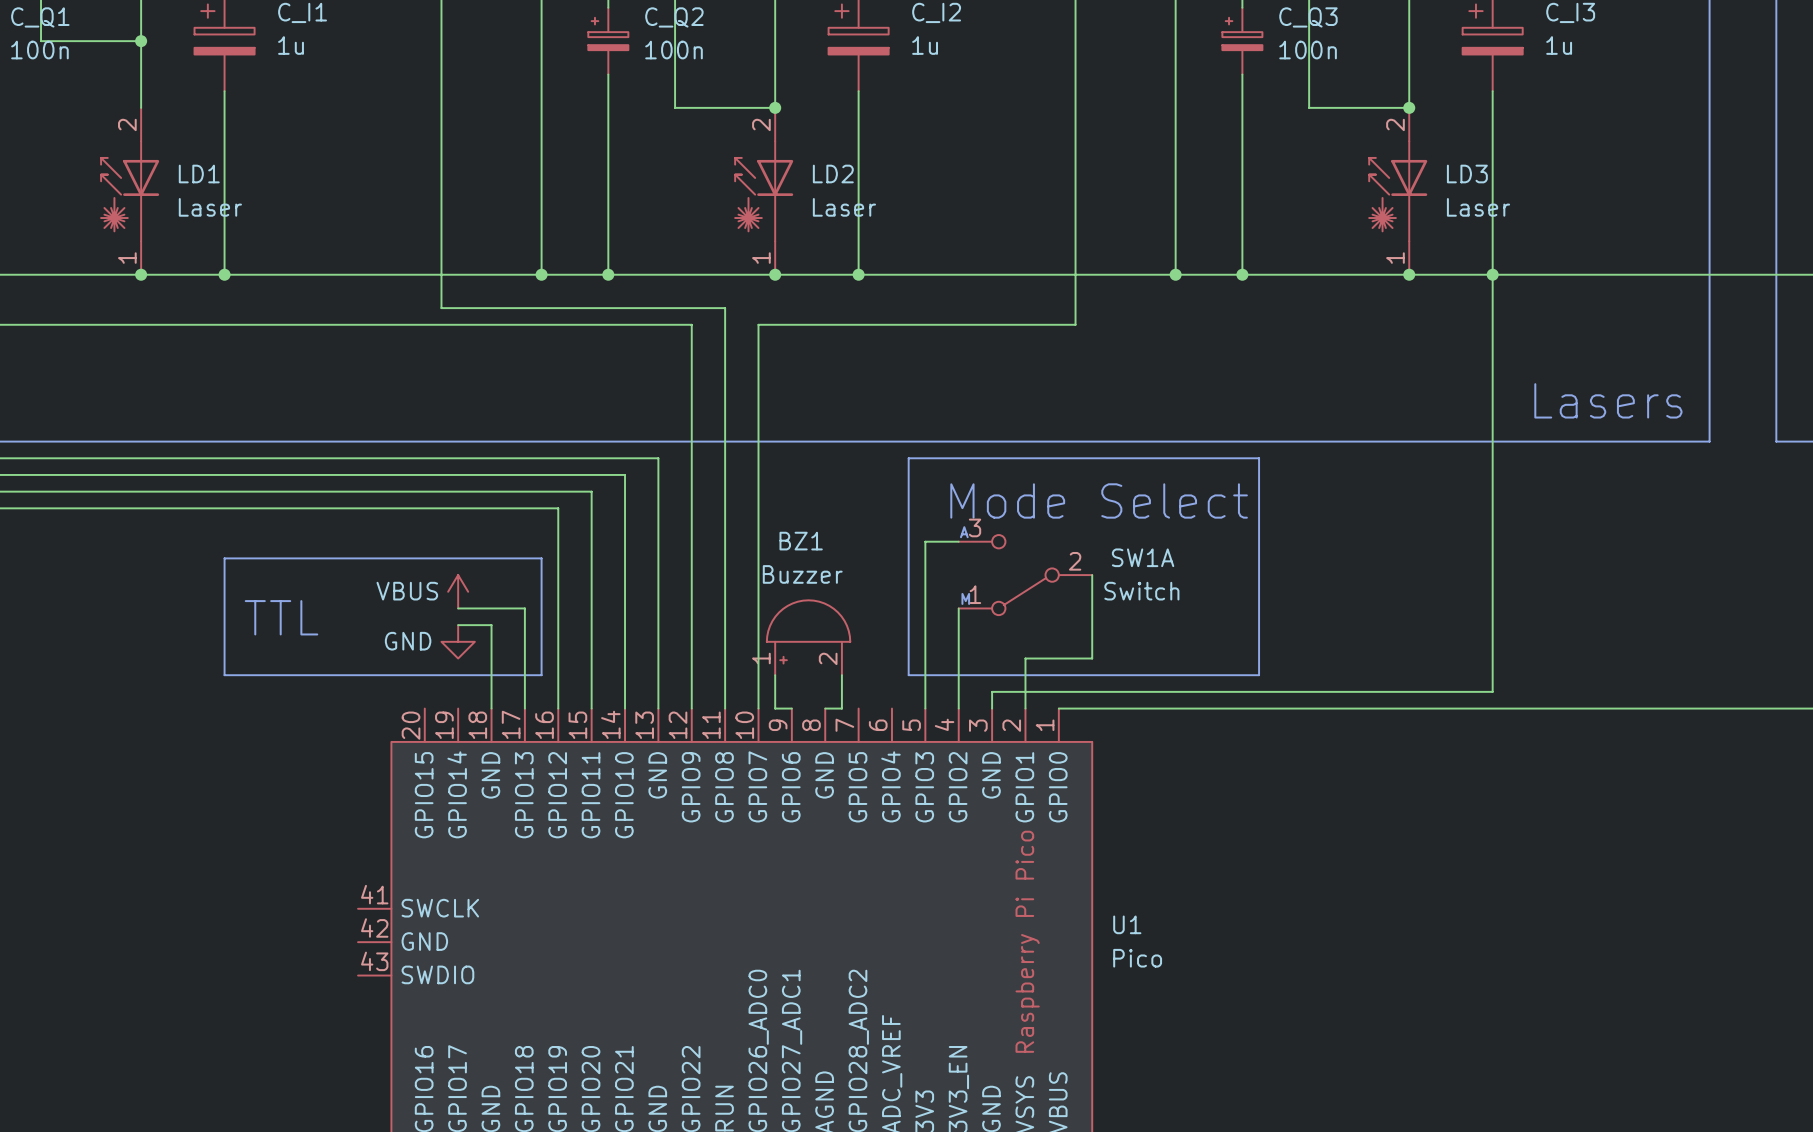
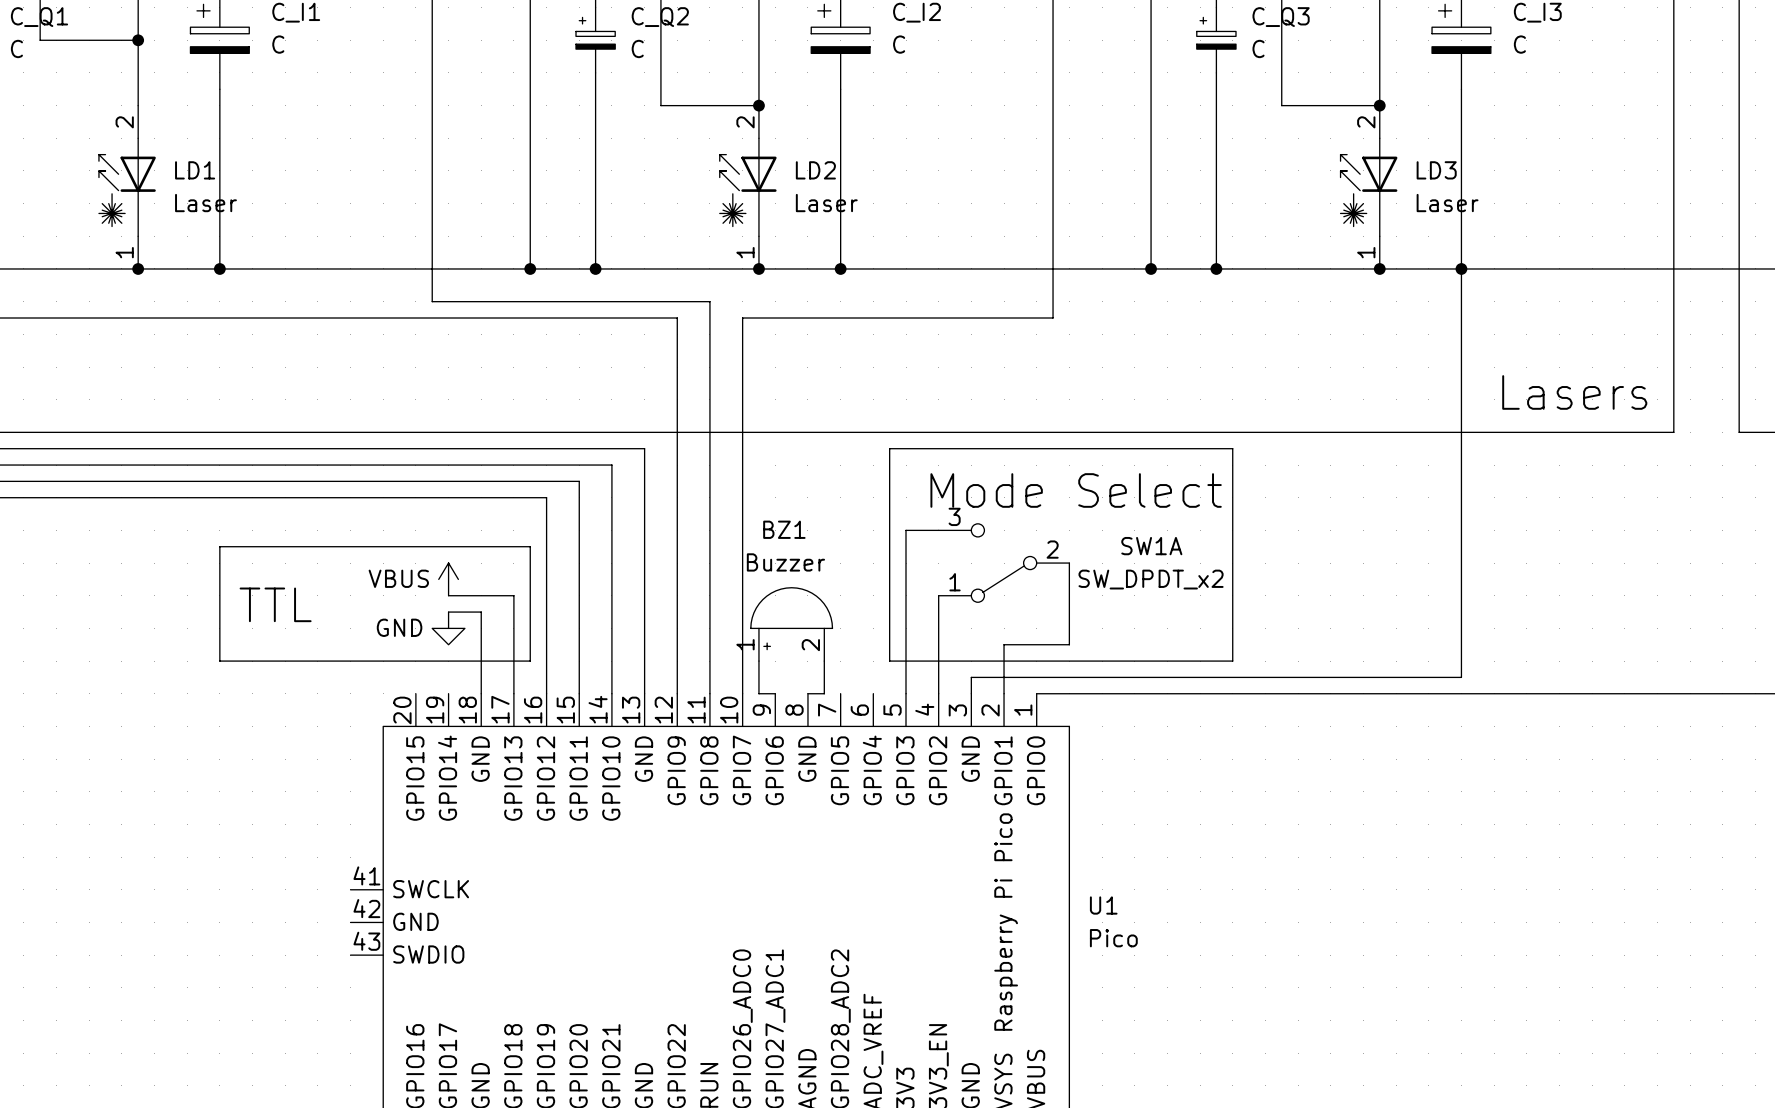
C_I1 value: 1u (291, 45) -> C (278, 44)
C_I2 value: 1u (925, 45) -> C (899, 44)
C_I3 value: 1u (1559, 45) -> C (1519, 44)
C_Q1 value: 100n (39, 50) -> C (16, 48)
C_Q2 value: 100n (674, 50) -> C (637, 48)
C_Q3 value: 100n (1308, 50) -> C (1258, 48)
text: A (964, 532) -> none
SW1A name position: SW1A (1143, 557) -> SW1A (1151, 546)
SW1A value: Switch (1141, 591) -> SW_DPDT_x2 (1151, 579)
text: M (965, 598) -> none

